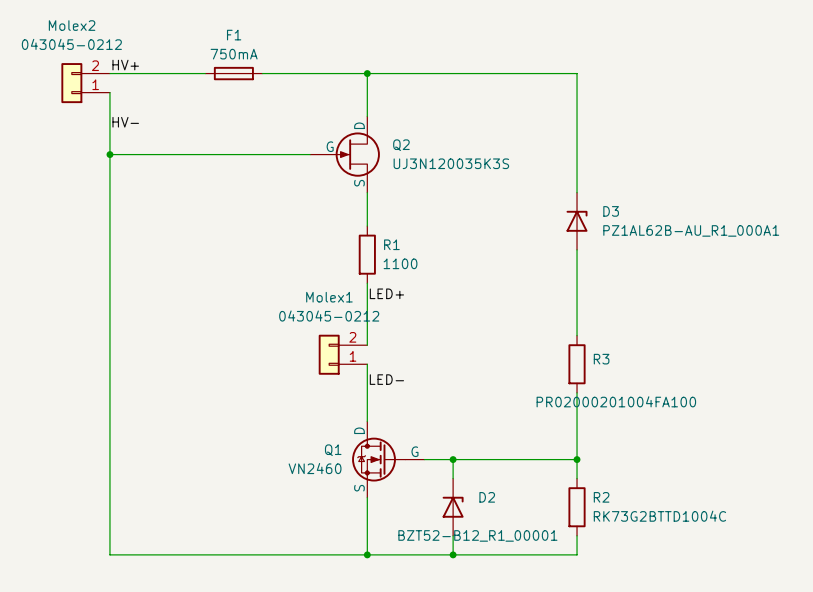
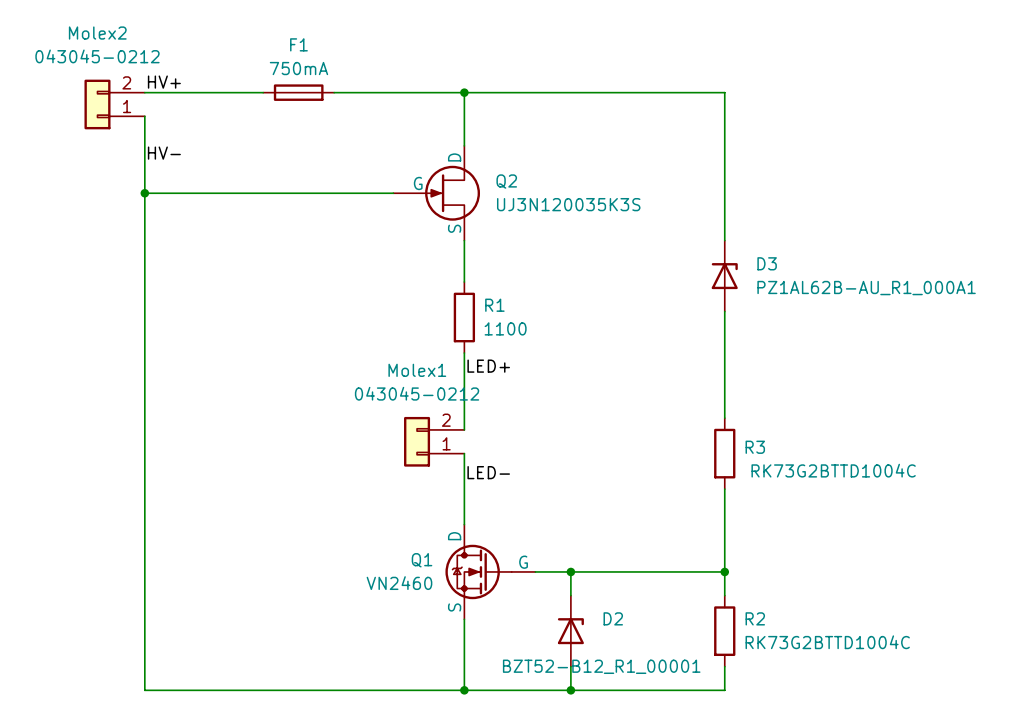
R3 value: PR02000201004FA100 (616, 401) -> RK73G2BTTD1004C (833, 470)

